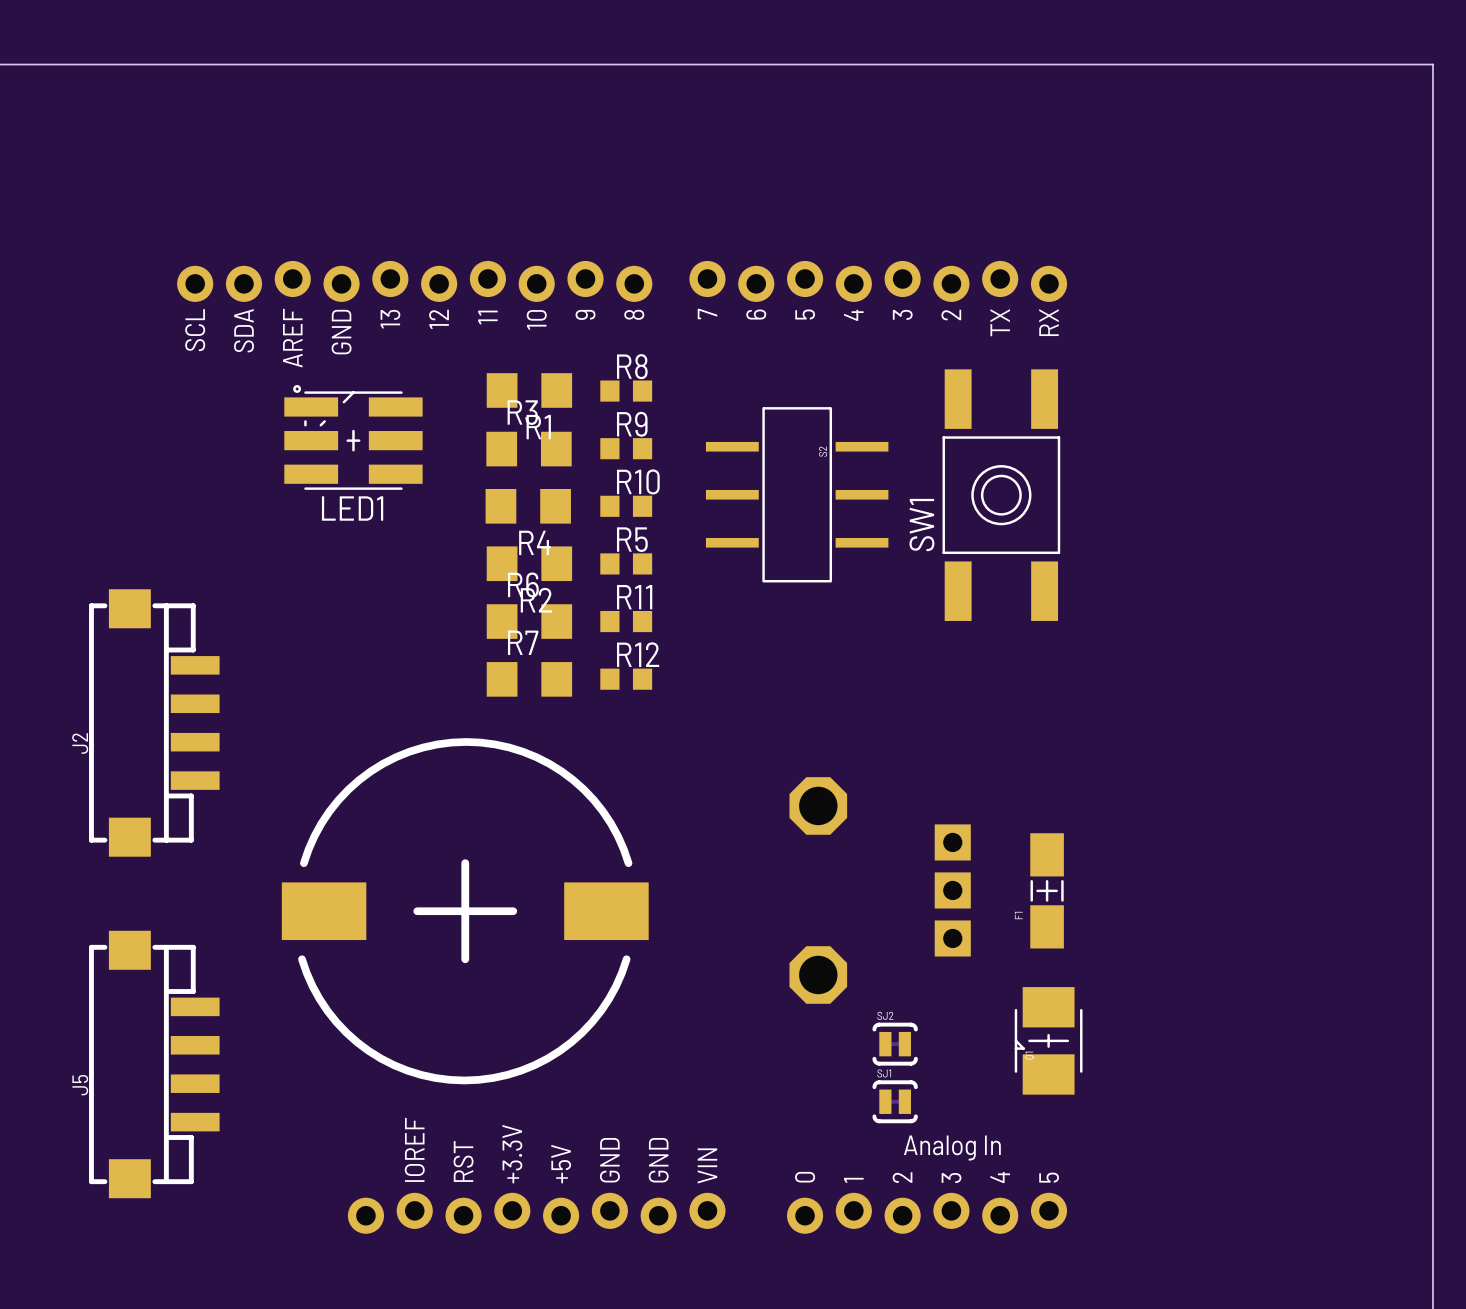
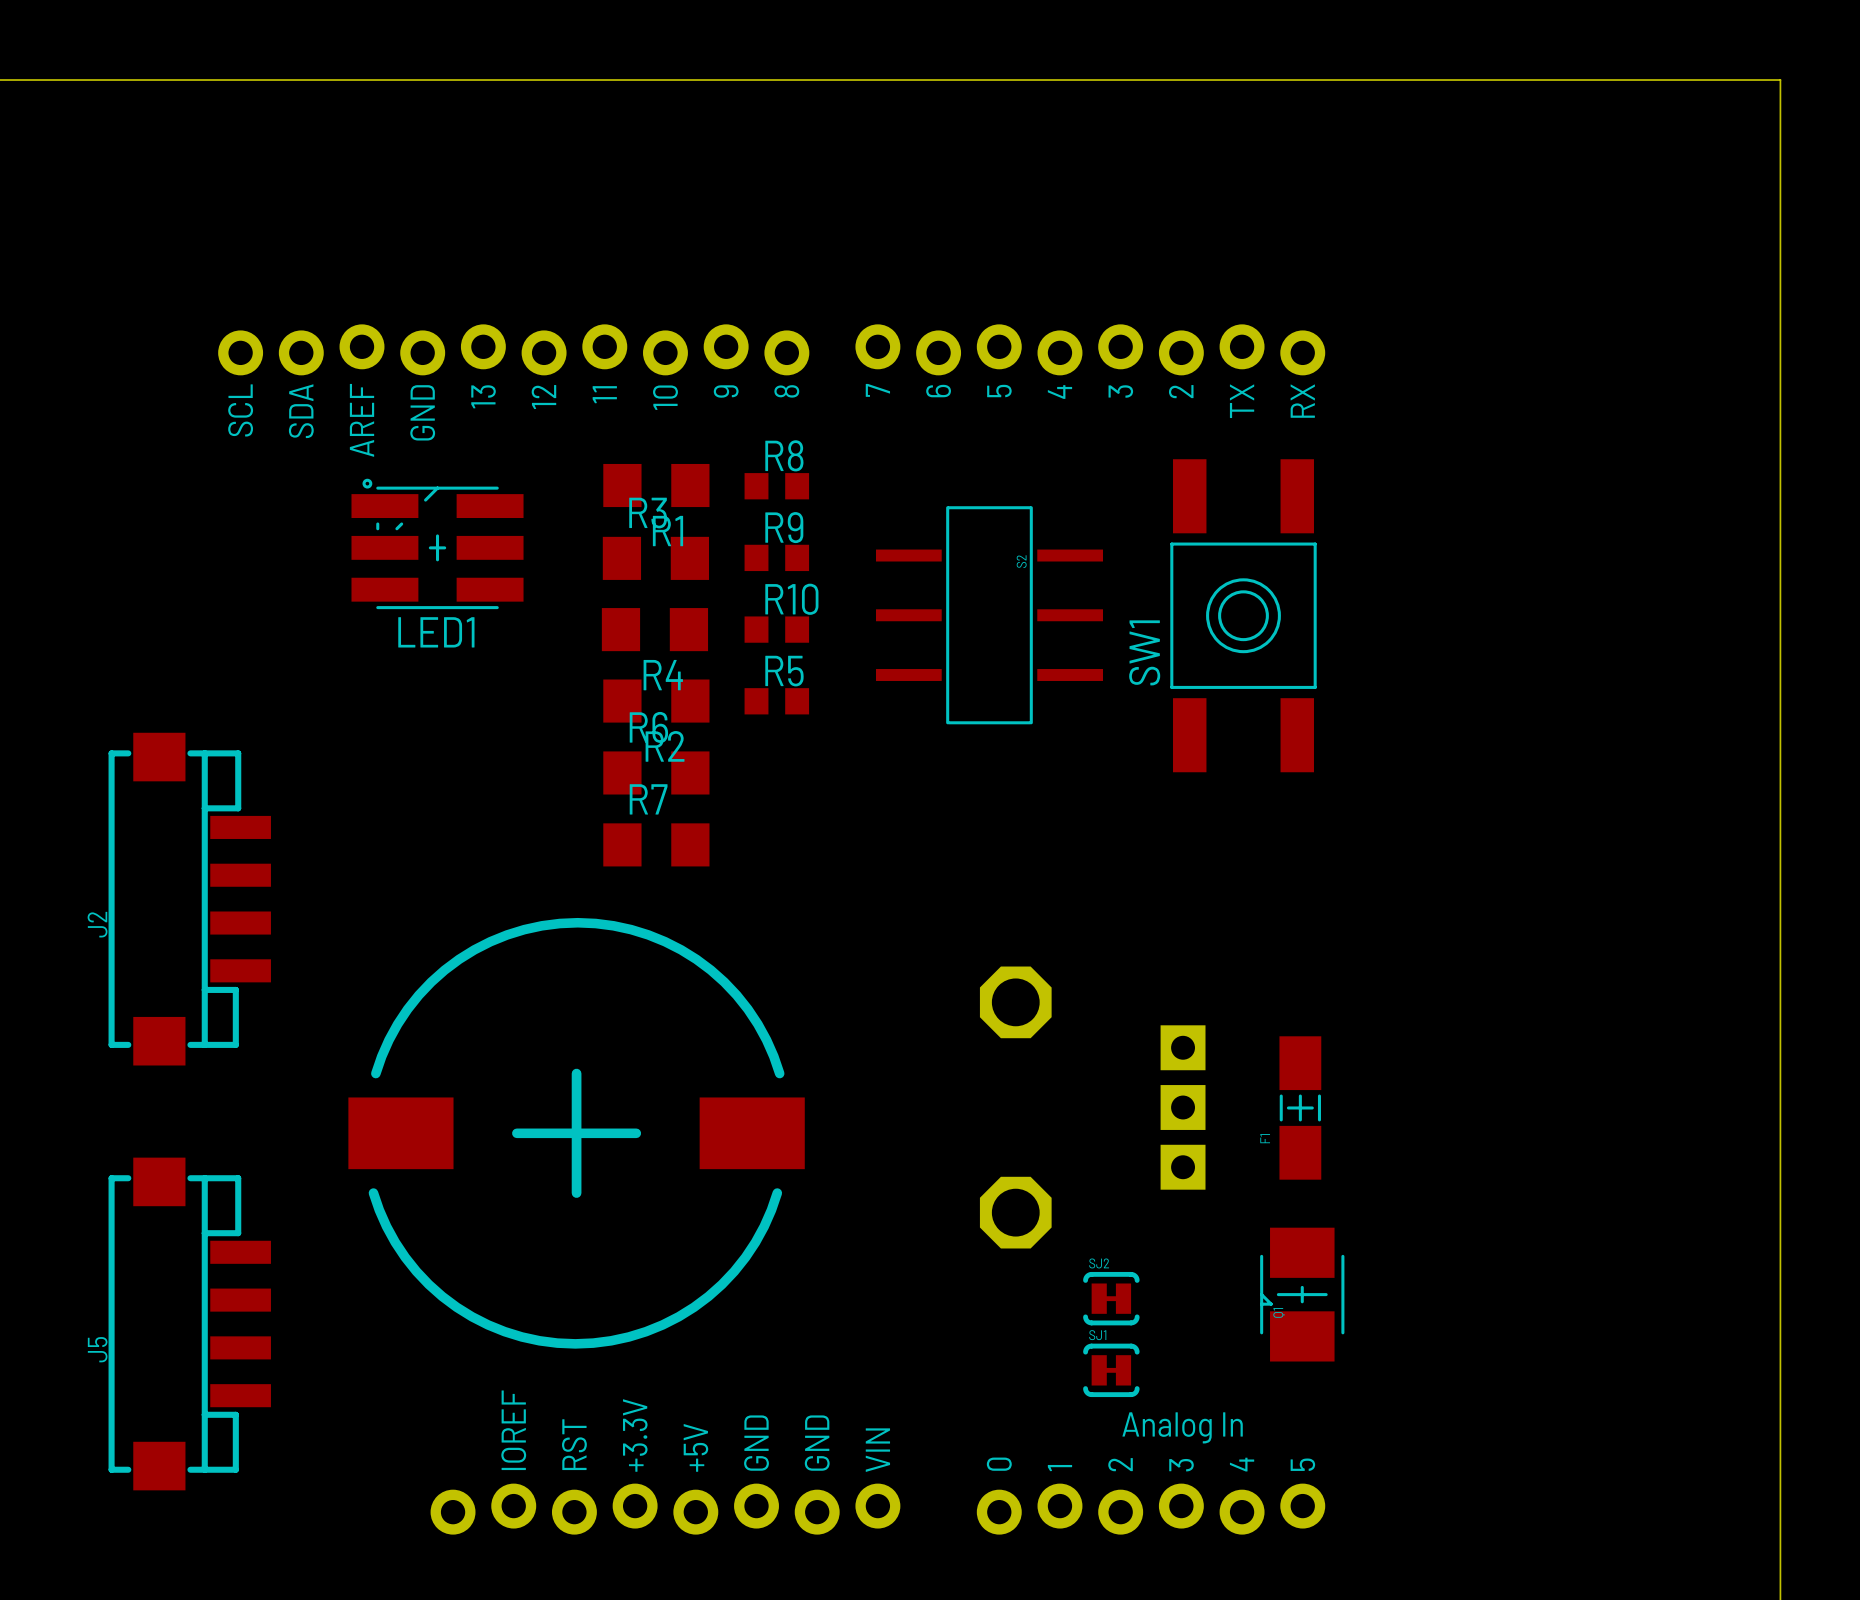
R11: (626, 621) -> none
R12: (626, 679) -> none

